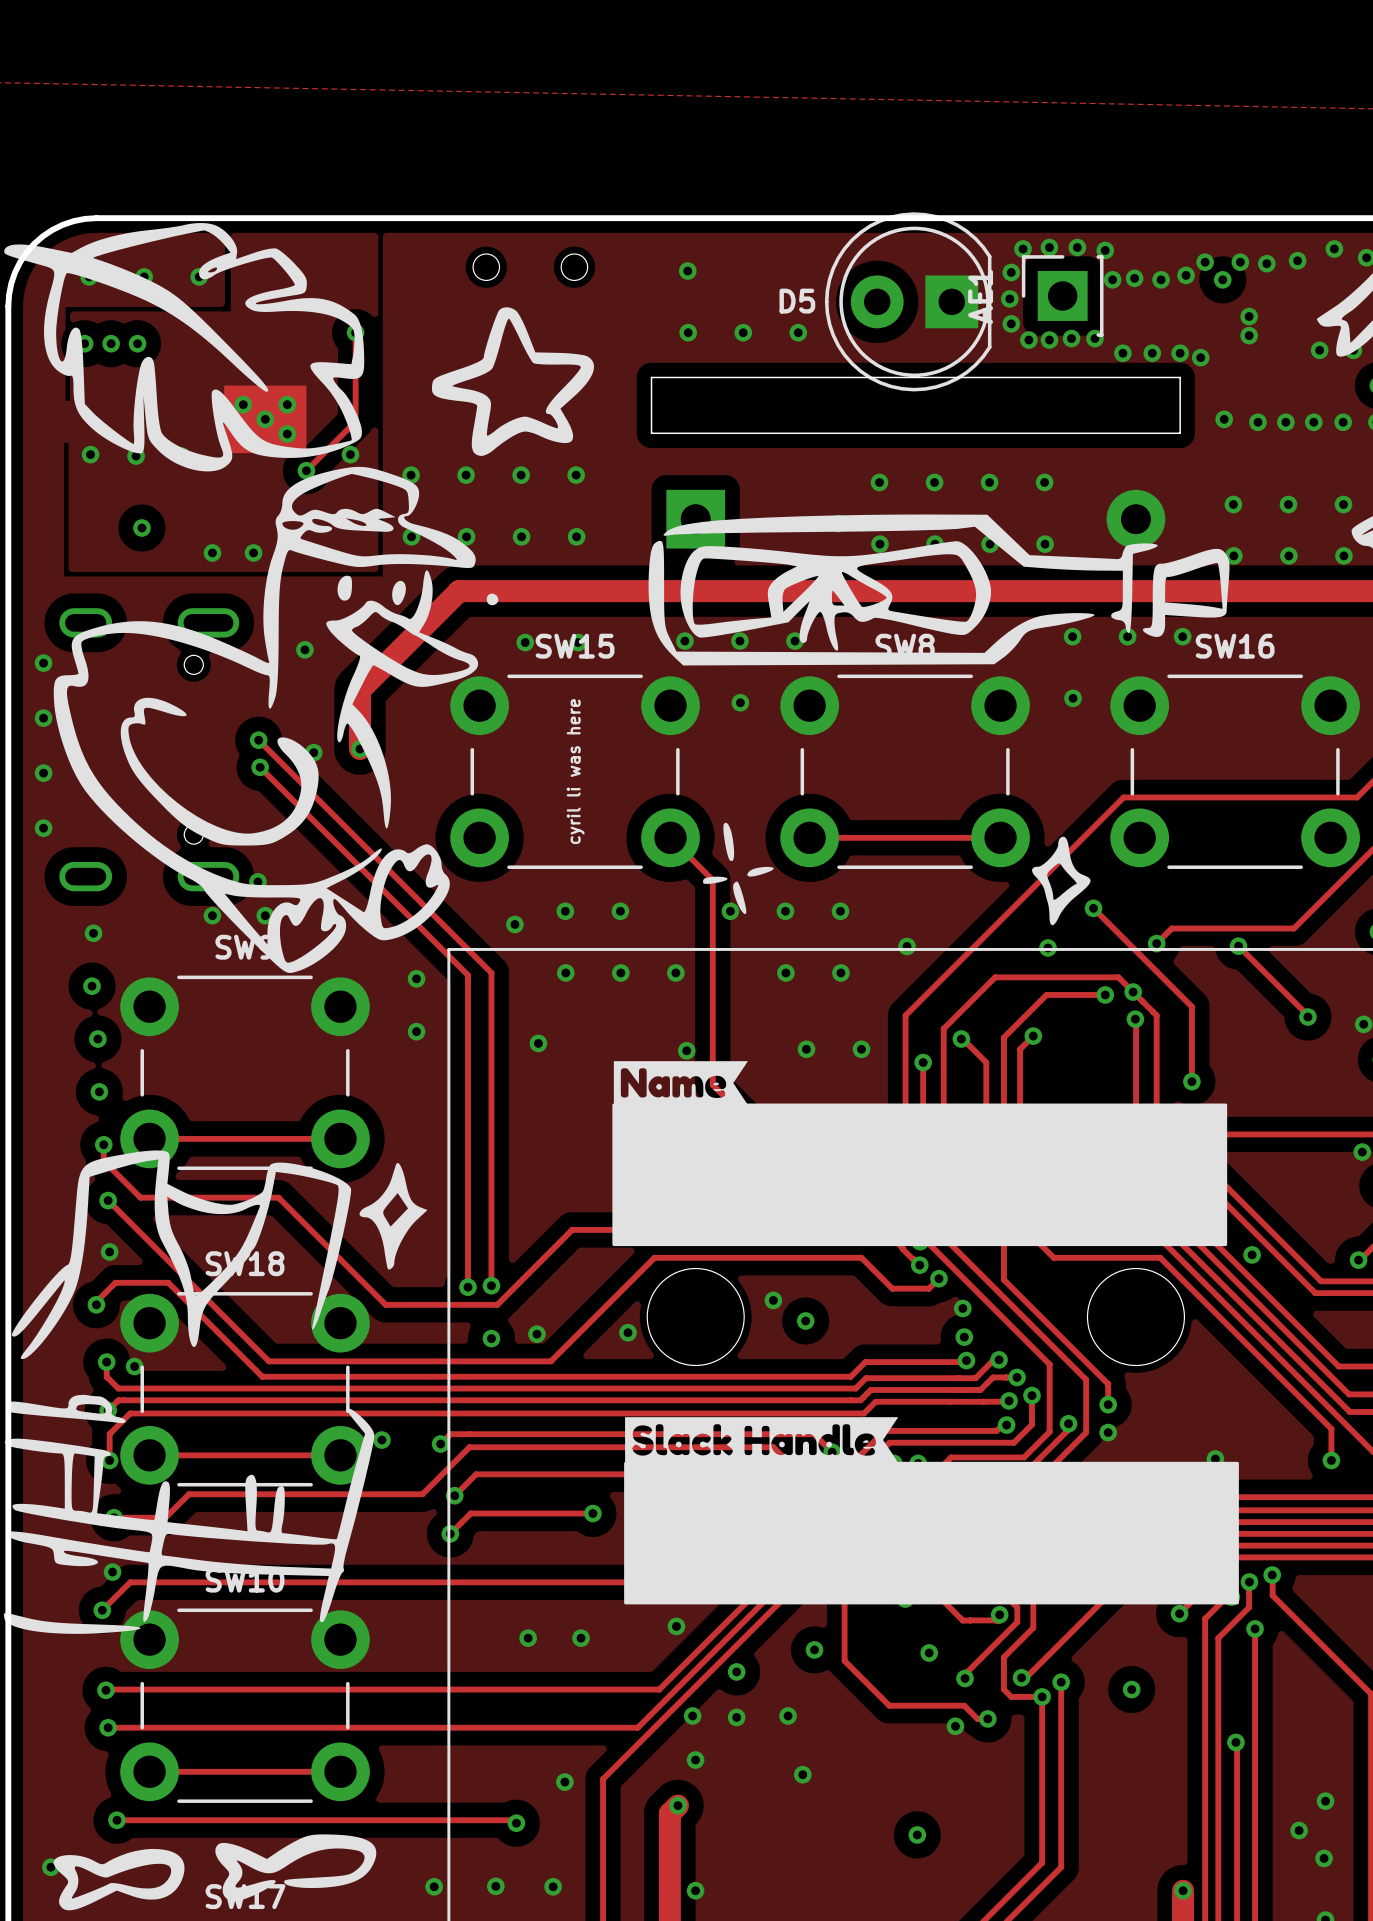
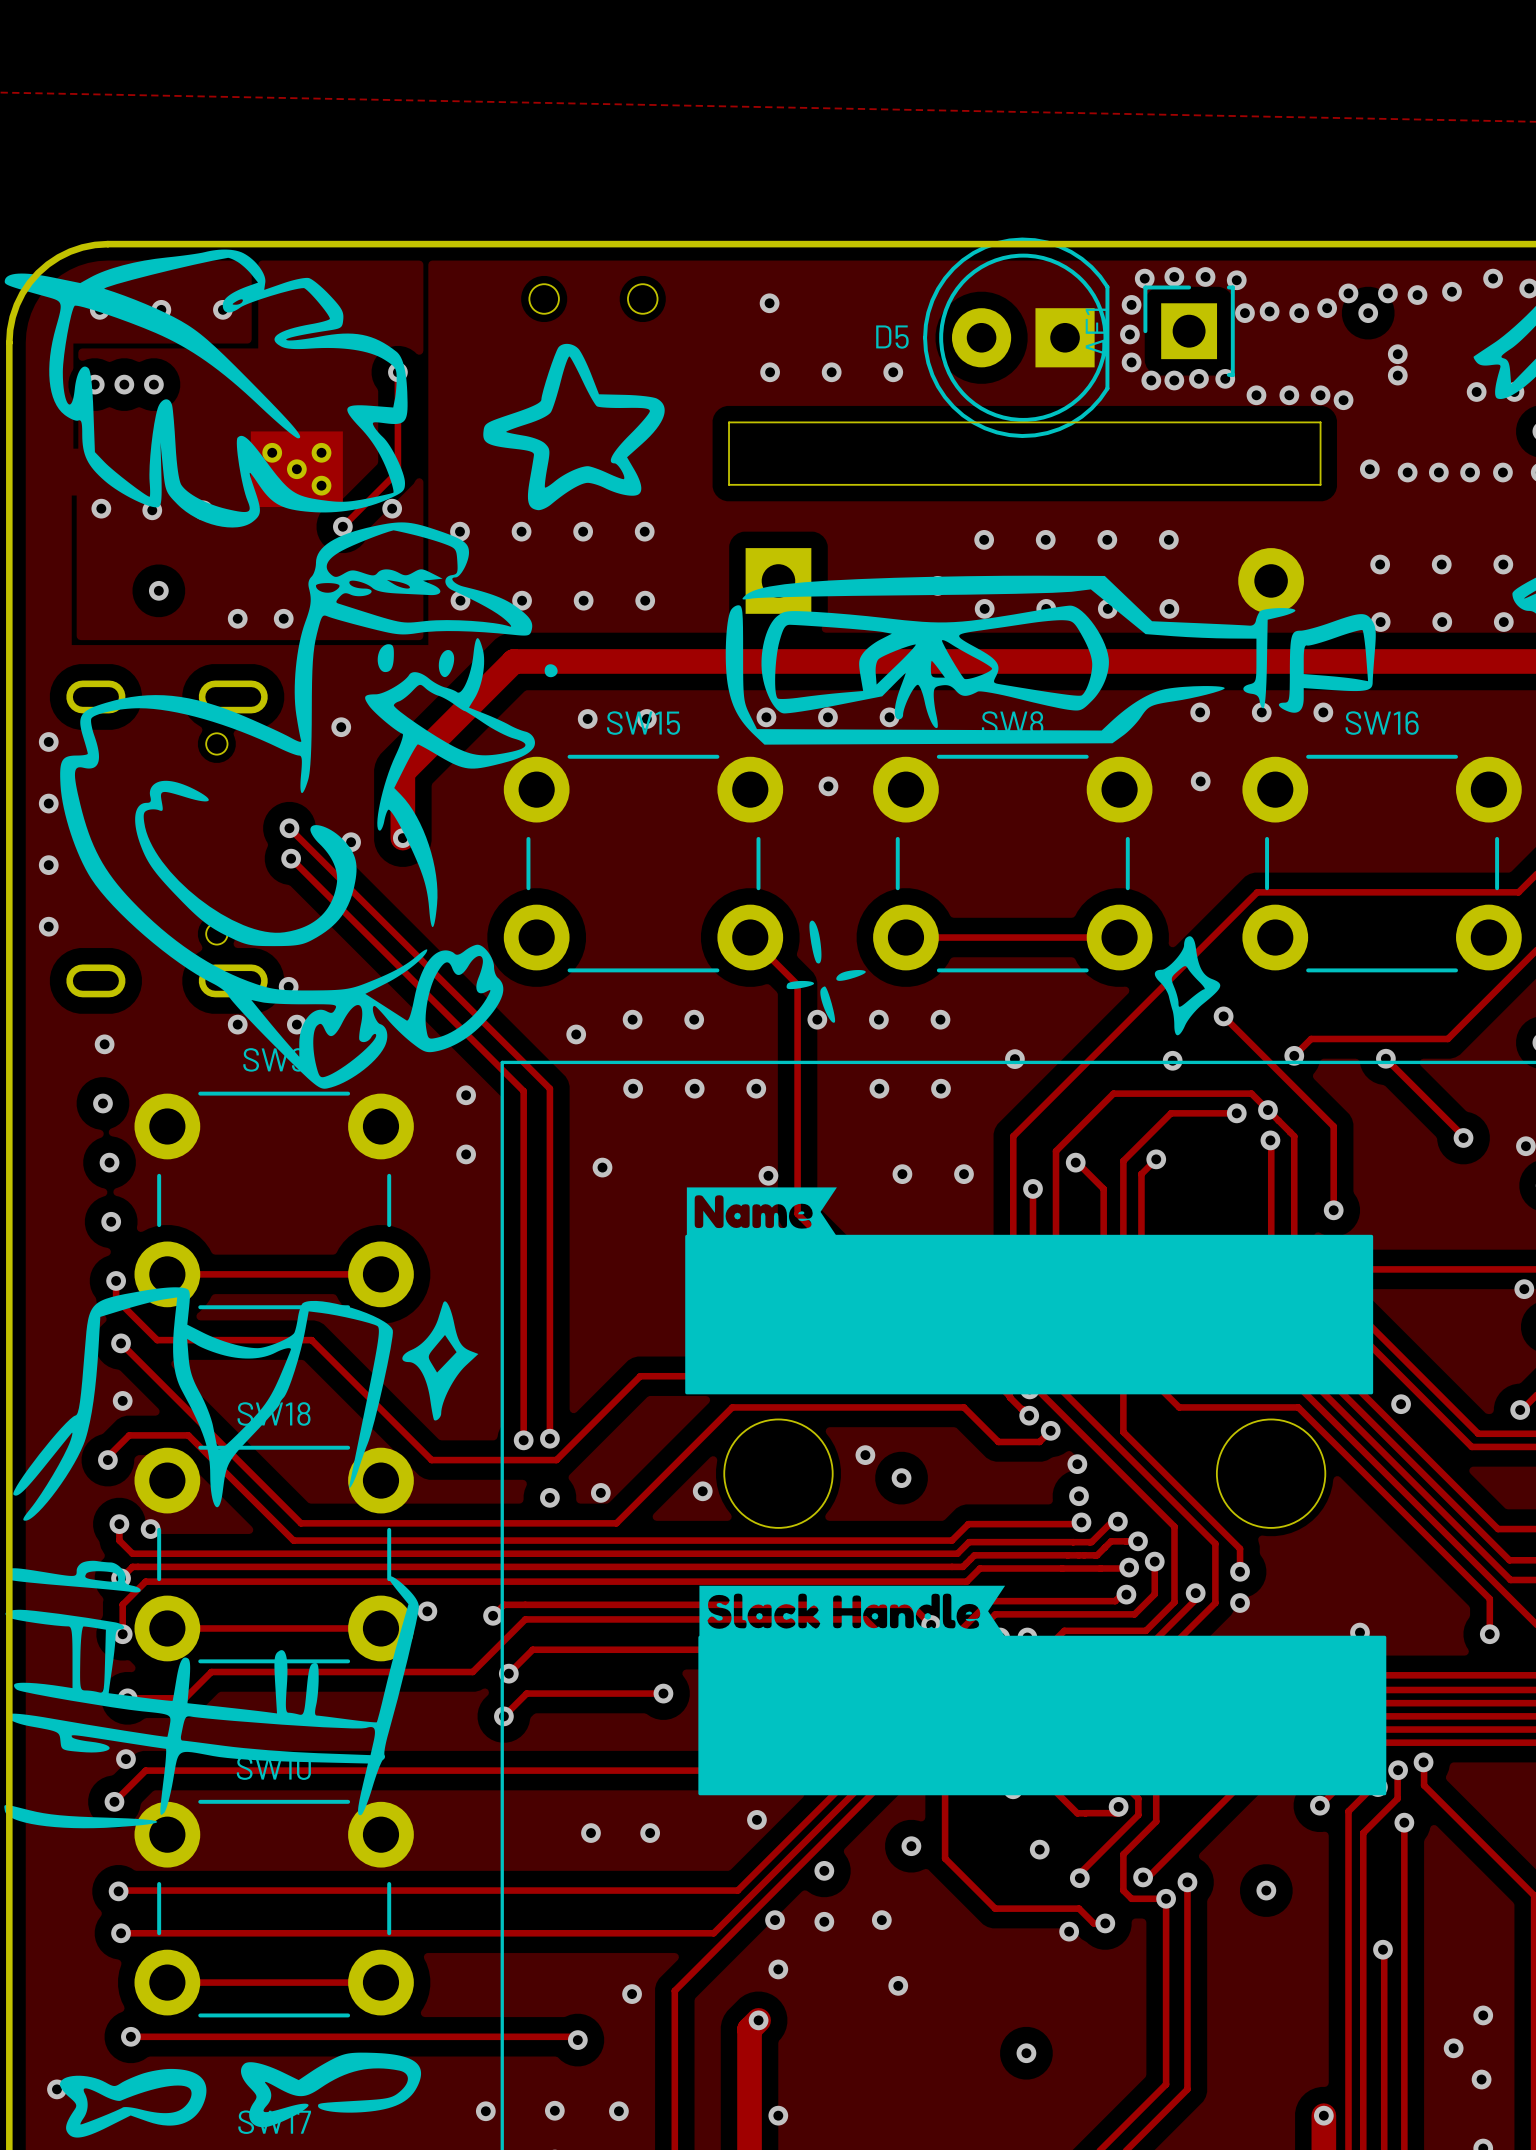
text: cyril li was here (575, 771) -> none

